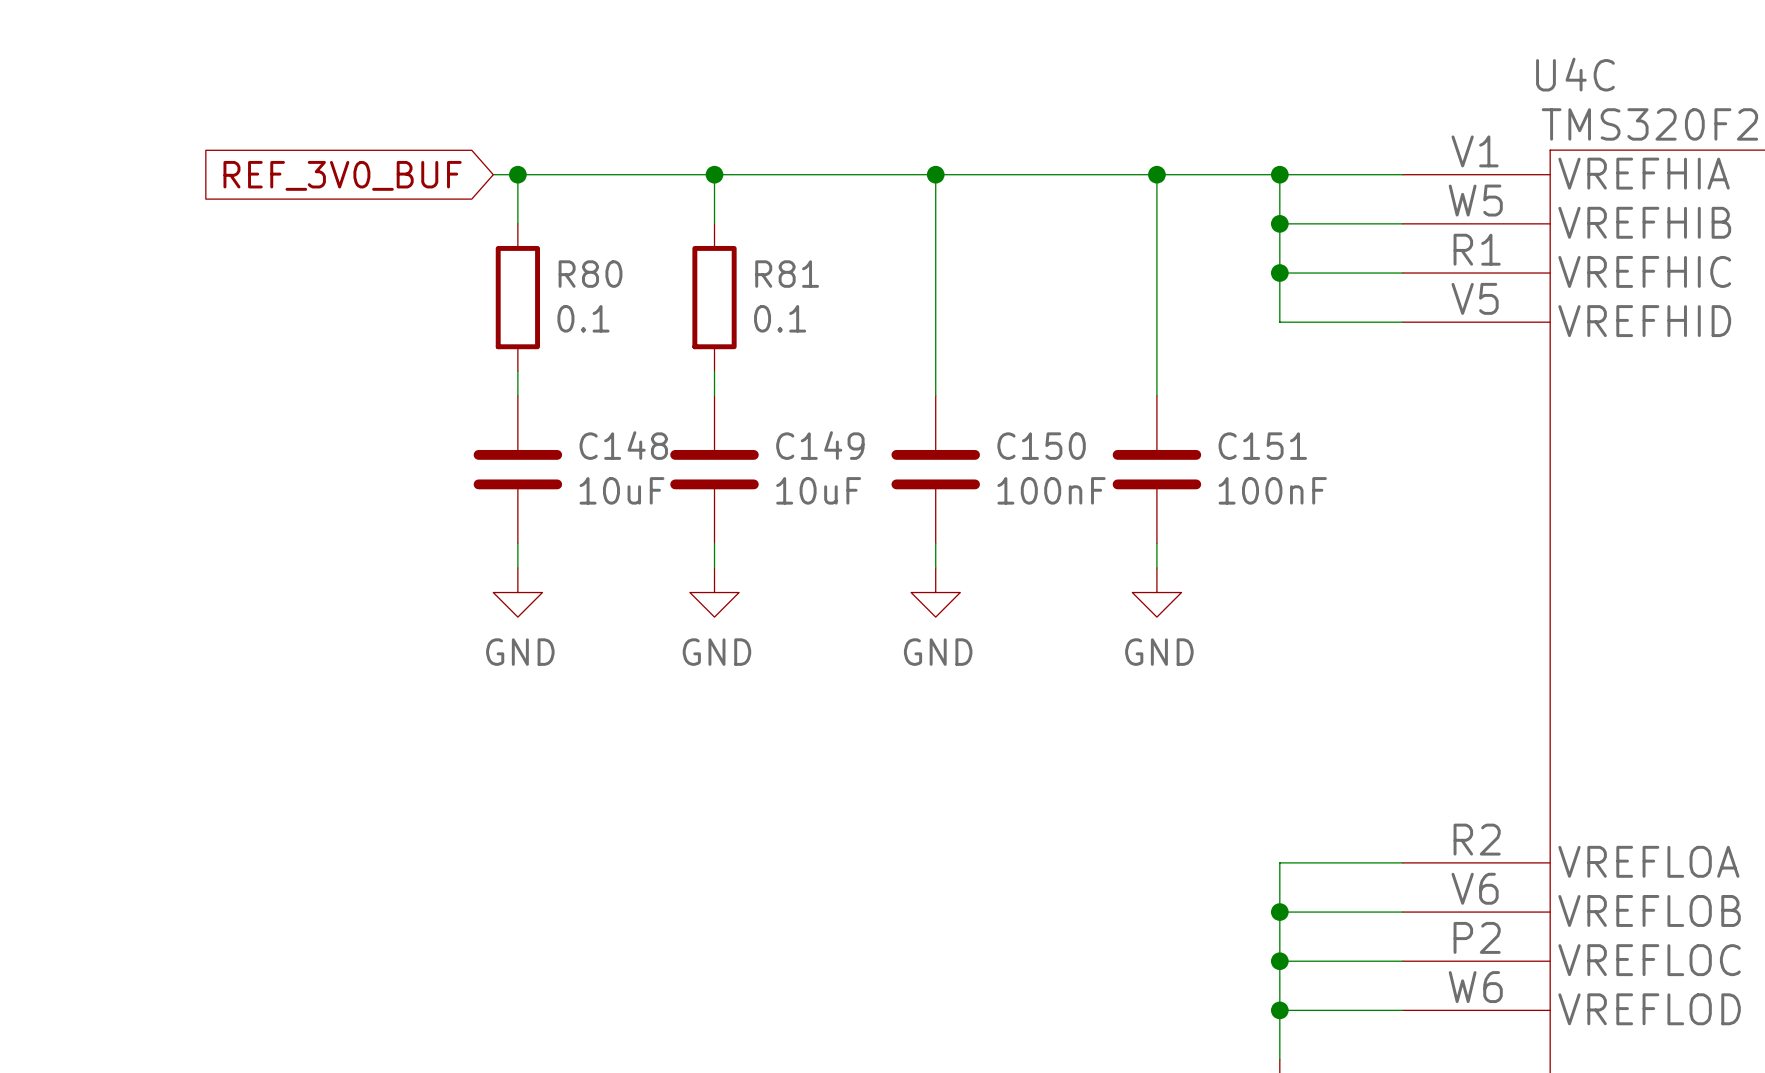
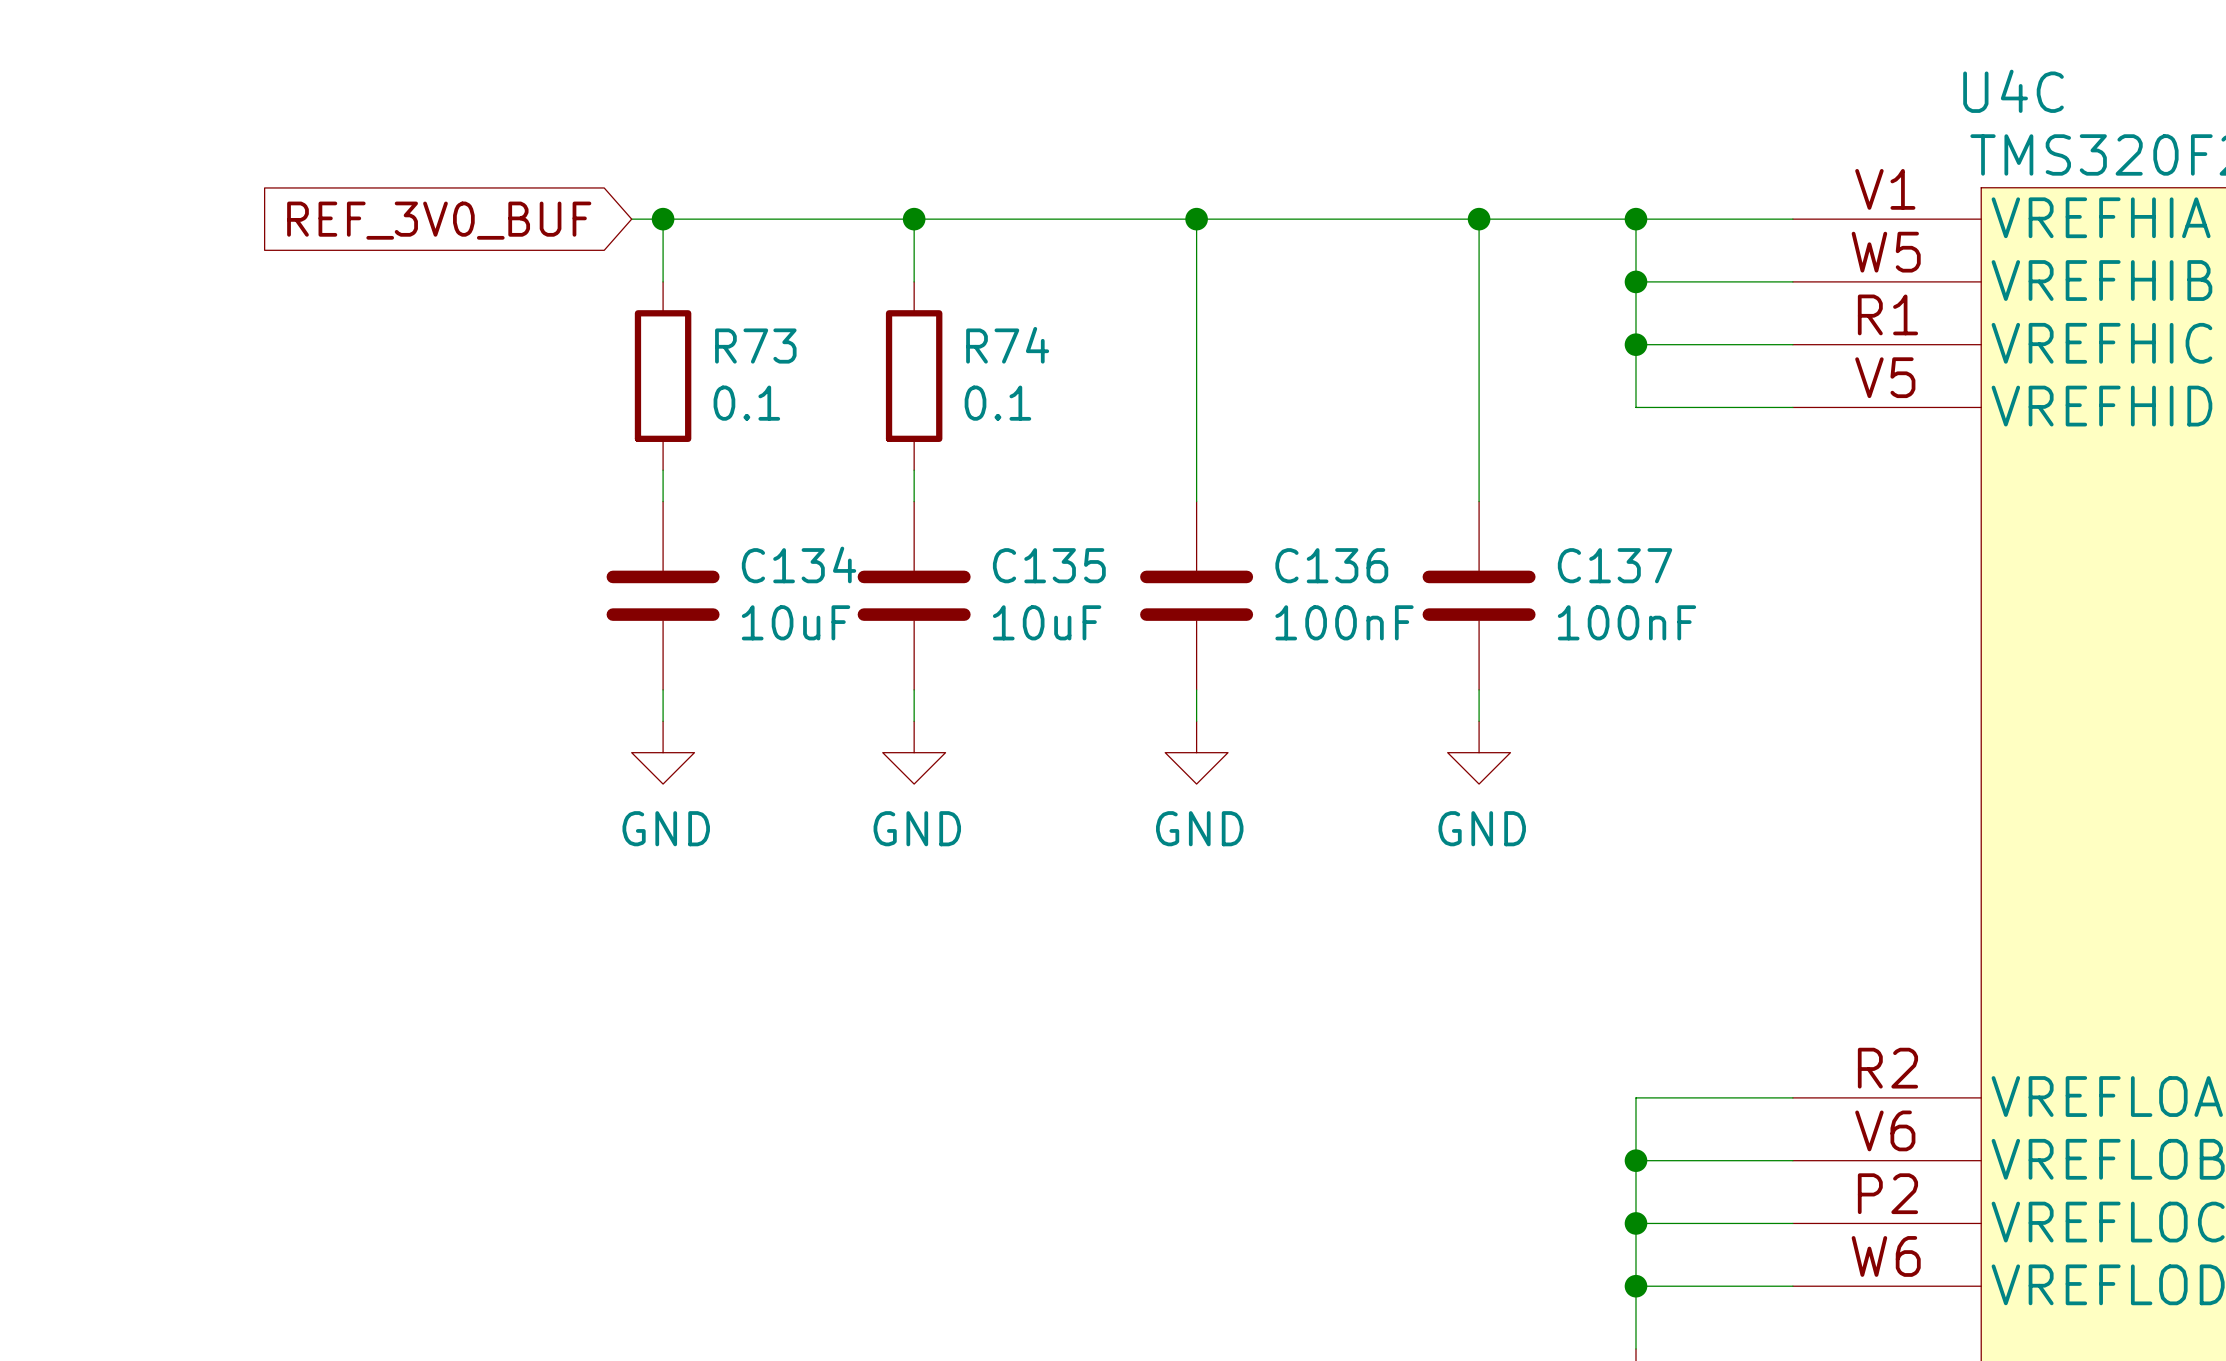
R80 name: R80 (590, 274) -> R73 (755, 346)
R81 name: R81 (787, 274) -> R74 (1007, 345)
C148 name: C148 (623, 445) -> C134 (799, 564)
C149 name: C149 (820, 445) -> C135 (1049, 565)
C150 name: C150 (1041, 446) -> C136 (1331, 565)
C151 name: C151 (1262, 446) -> C137 (1615, 565)

